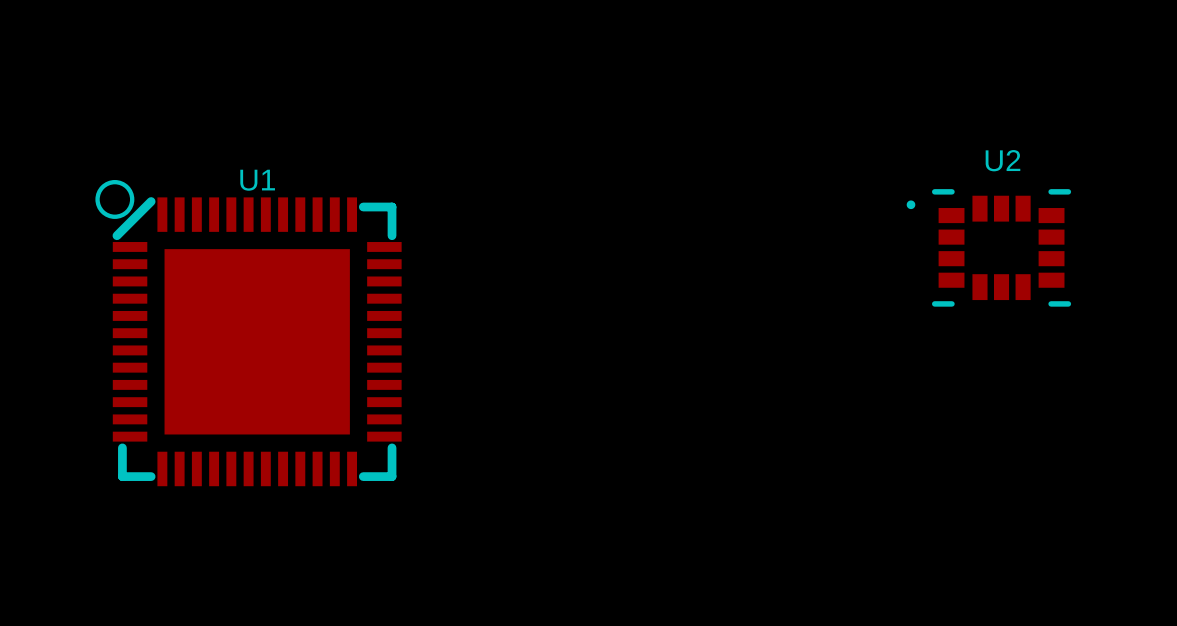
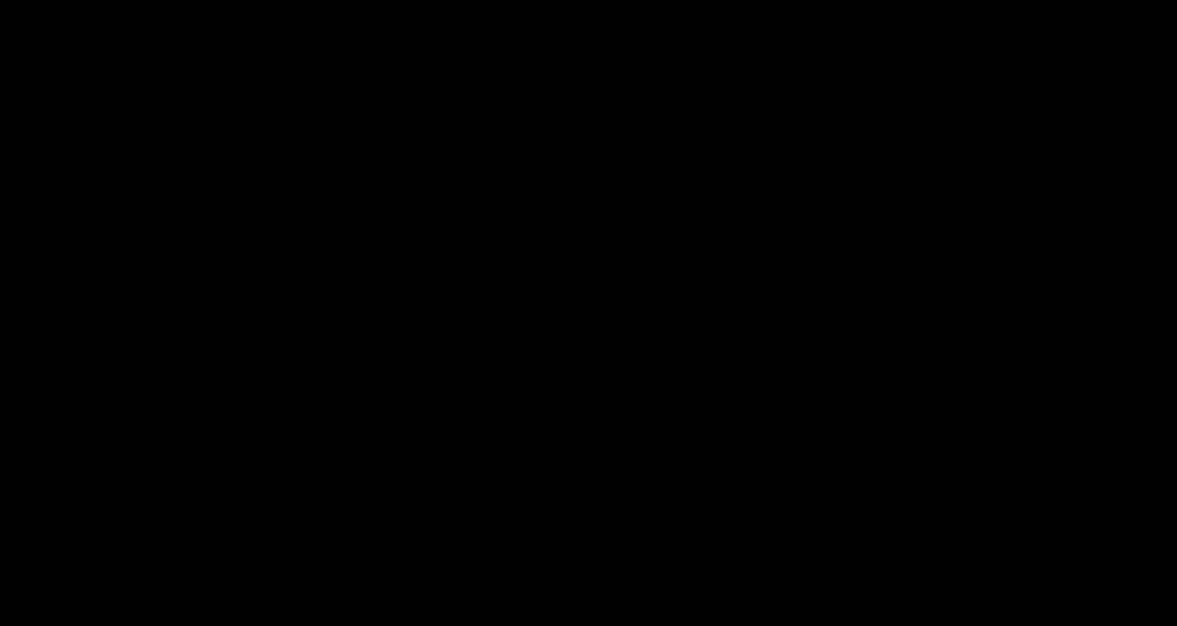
U2: (988, 247) -> none
U1: (248, 333) -> none

